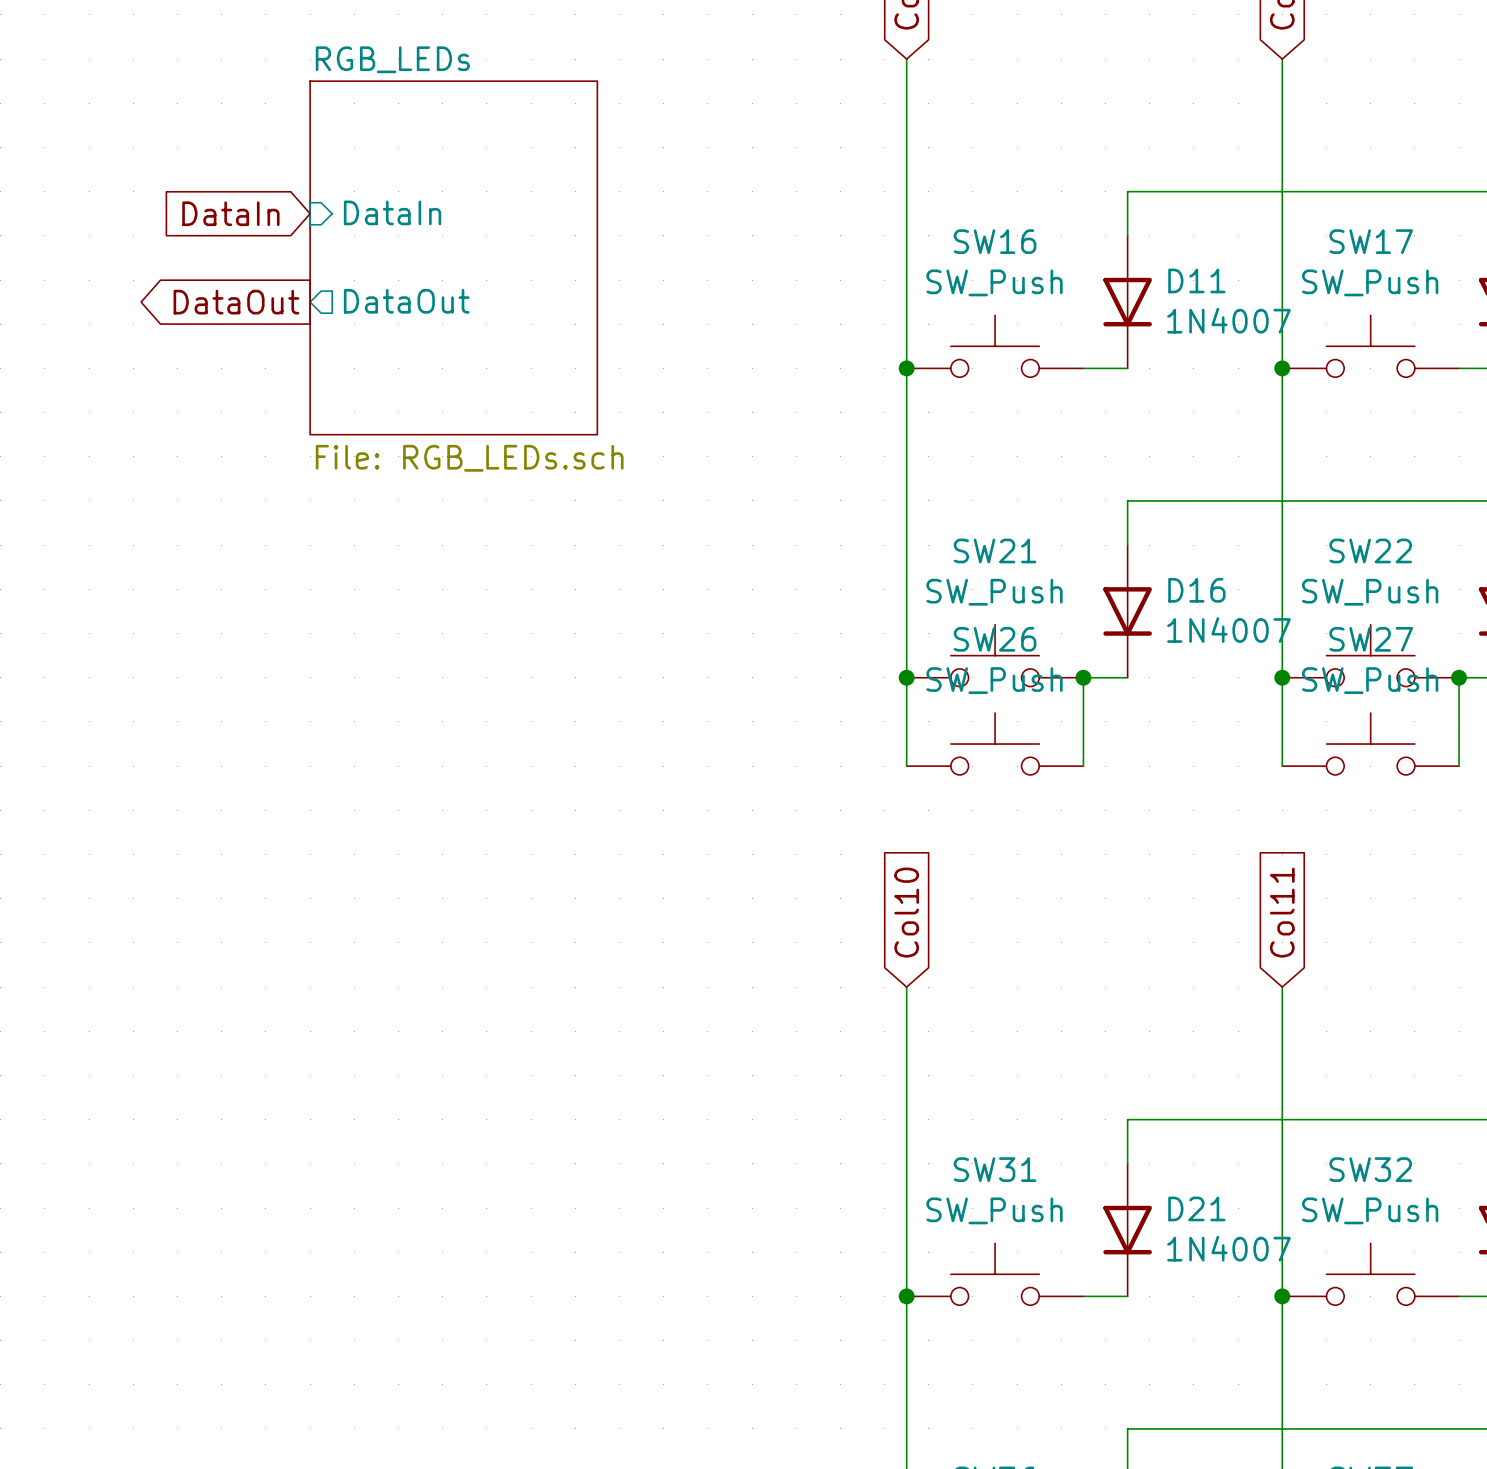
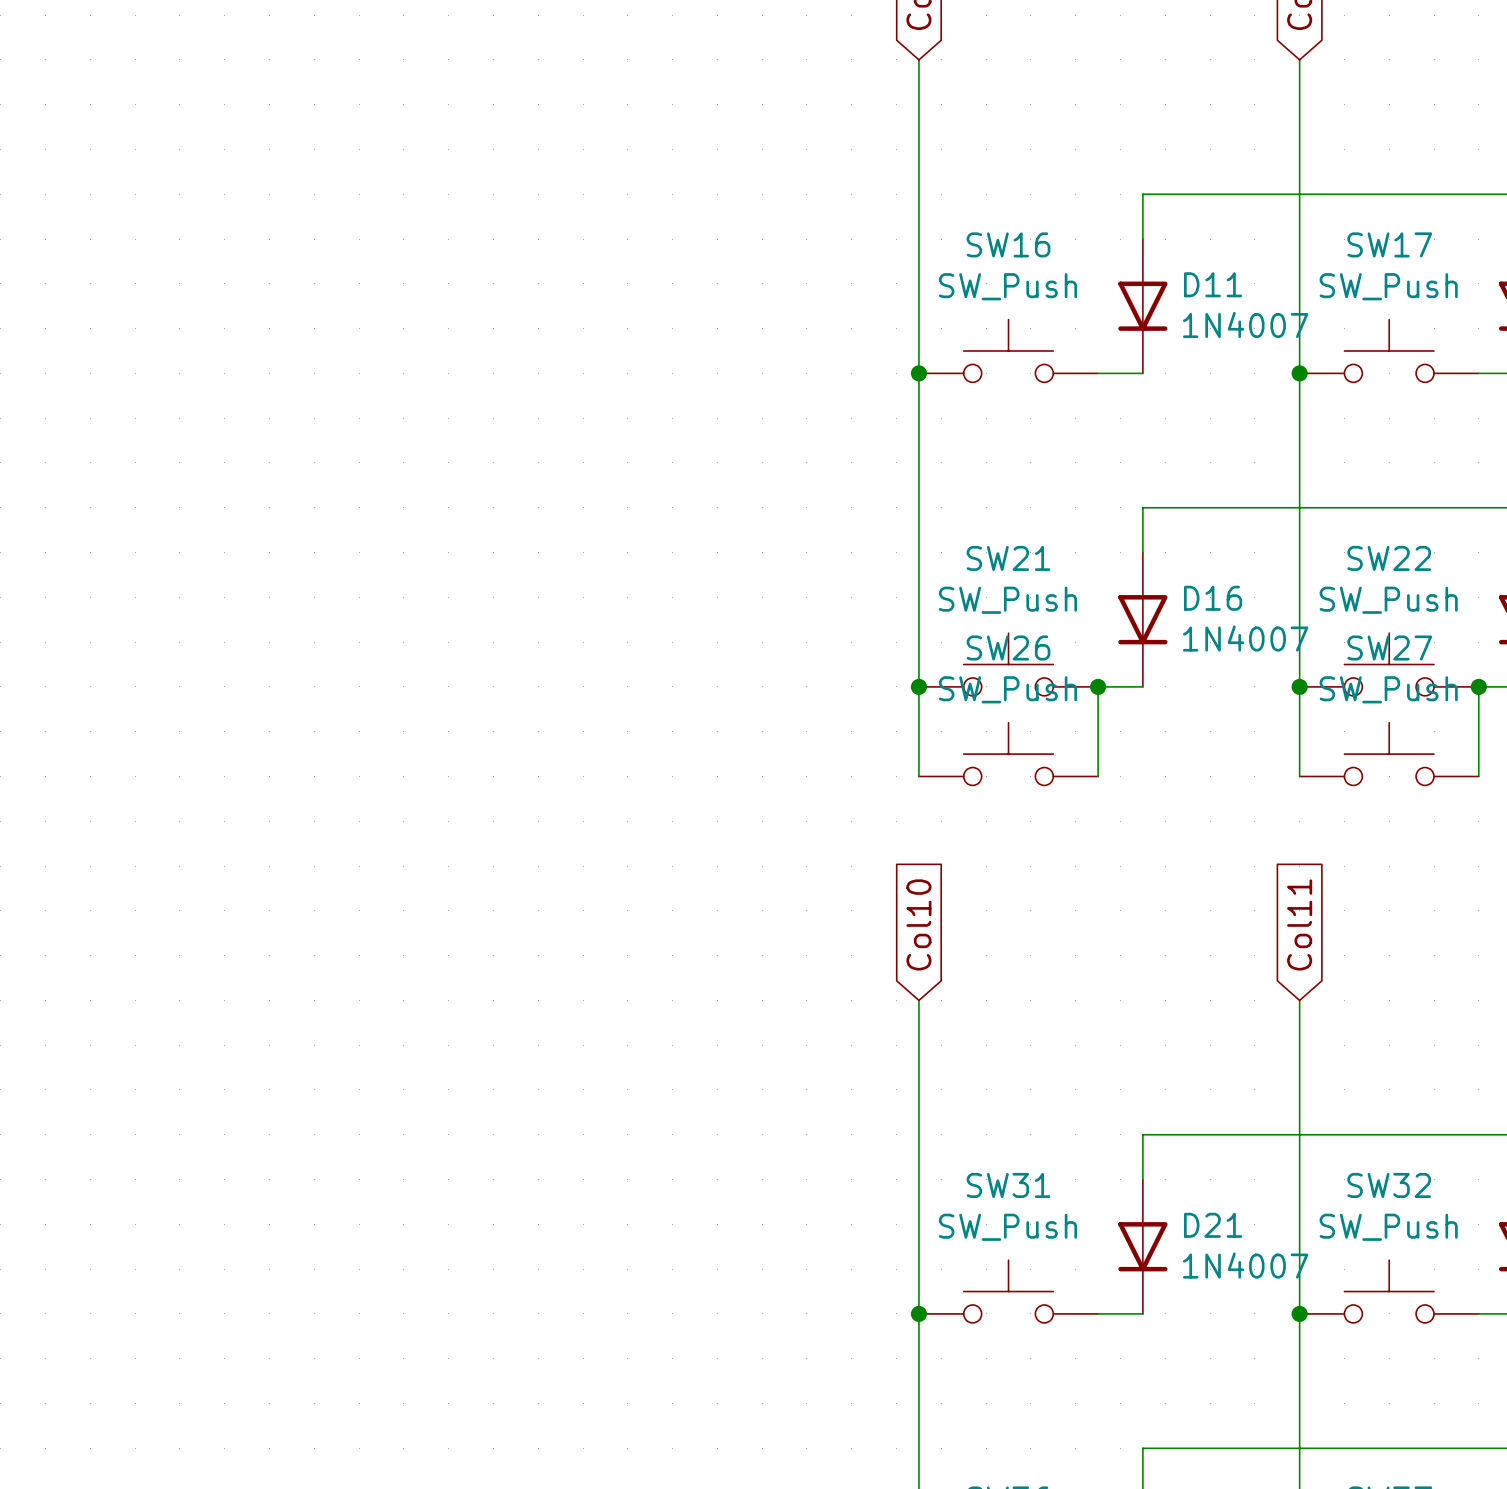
sheet pin: DataIn (392, 212) -> none
global label: DataIn (230, 213) -> none
sheet RGB_LEDs: File: RGB_LEDs.sch (453, 257) -> none
sheet pin: DataOut (406, 301) -> none
global label: DataOut (236, 302) -> none

